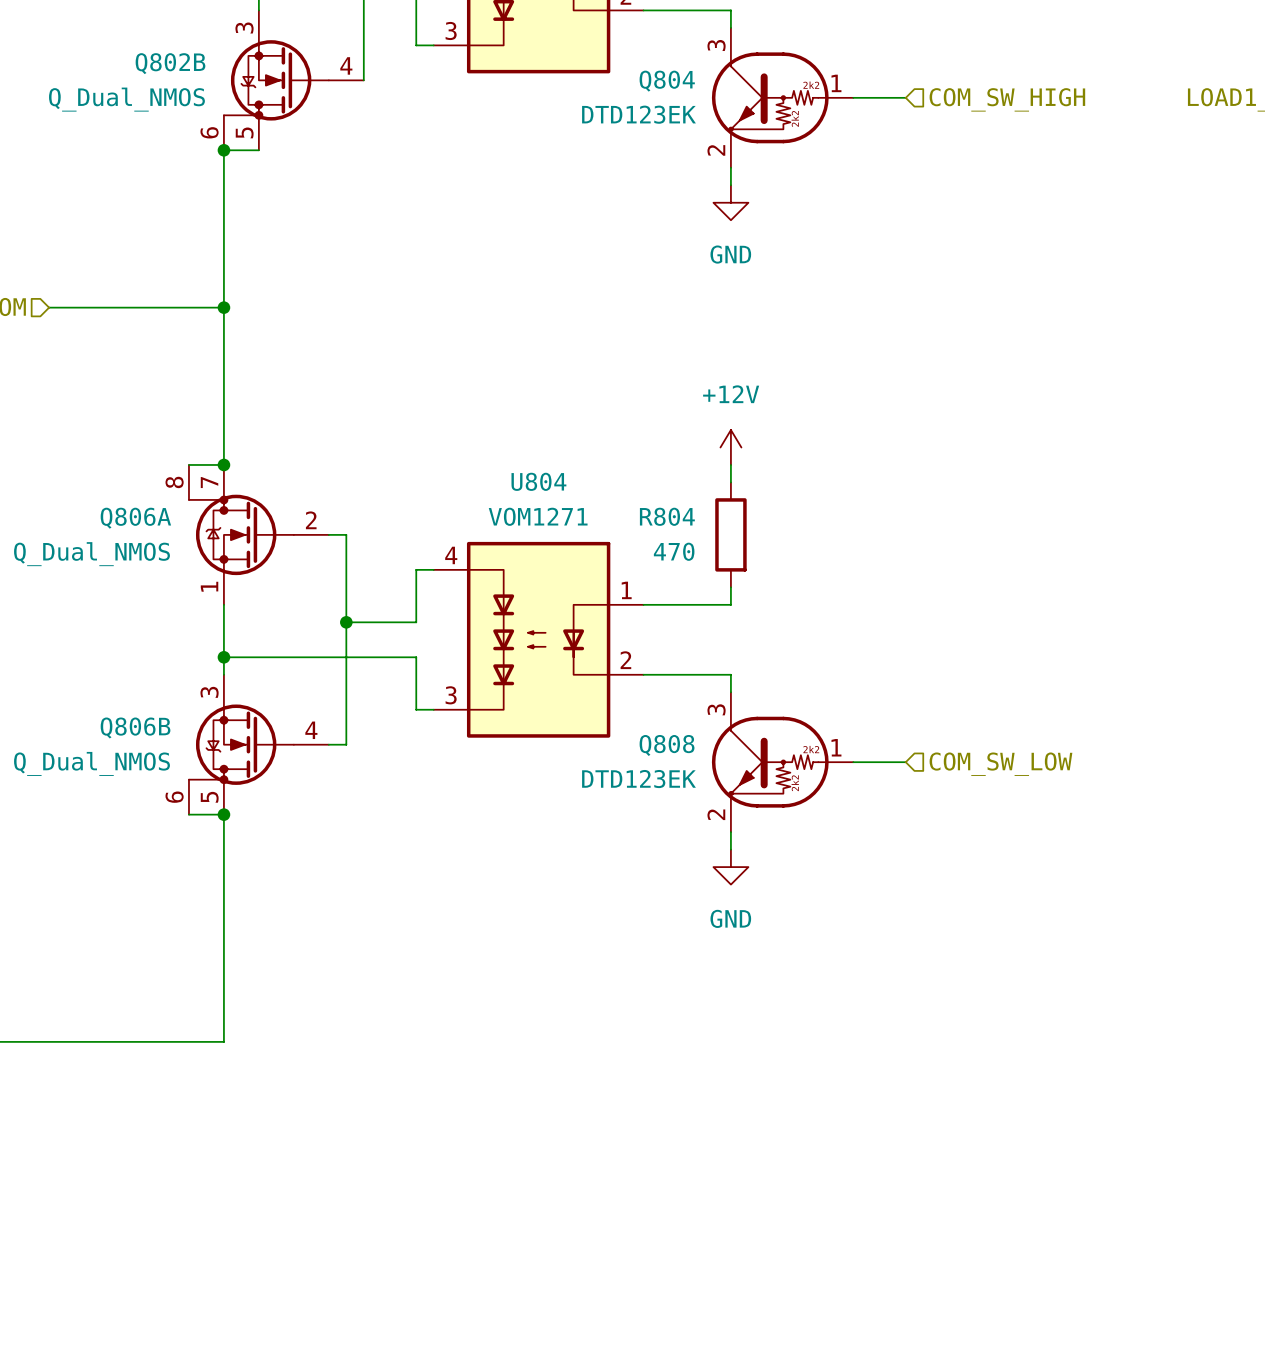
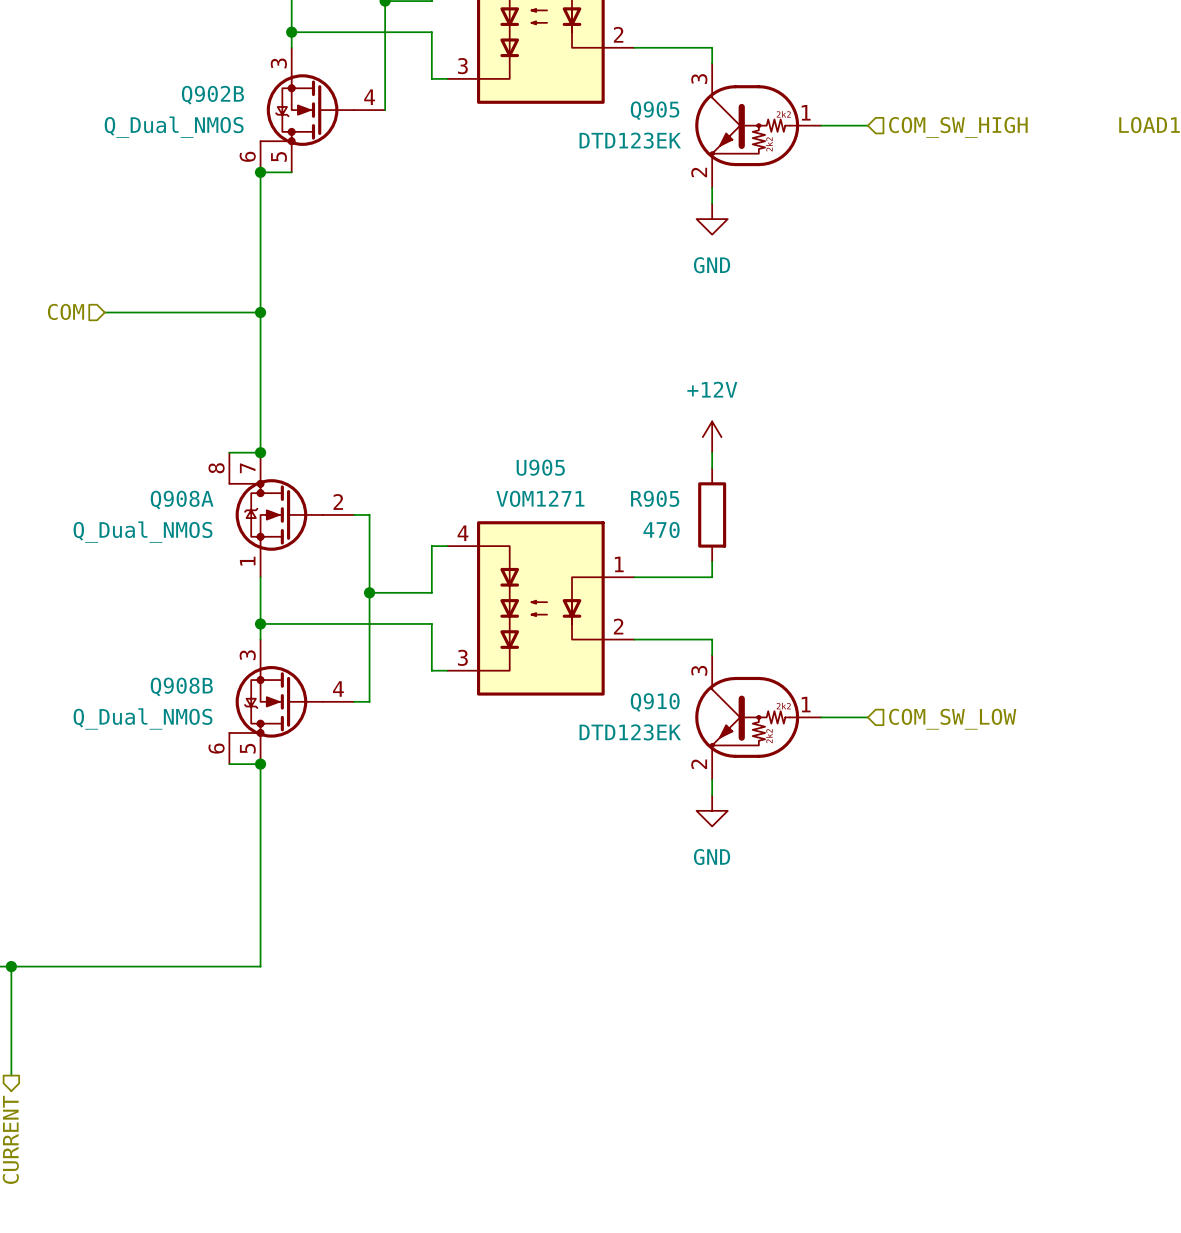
Q802B name: Q802B (170, 63) -> Q902B (212, 95)
Q804 name: Q804 (667, 81) -> Q905 (655, 110)
U804 name: U804 (538, 481) -> U905 (540, 467)
R804 name: R804 (667, 516) -> R905 (655, 498)
Q806A name: Q806A (135, 518) -> Q908A (182, 500)
Q806B name: Q806B (135, 727) -> Q908B (181, 686)
Q808 name: Q808 (667, 745) -> Q910 (655, 702)

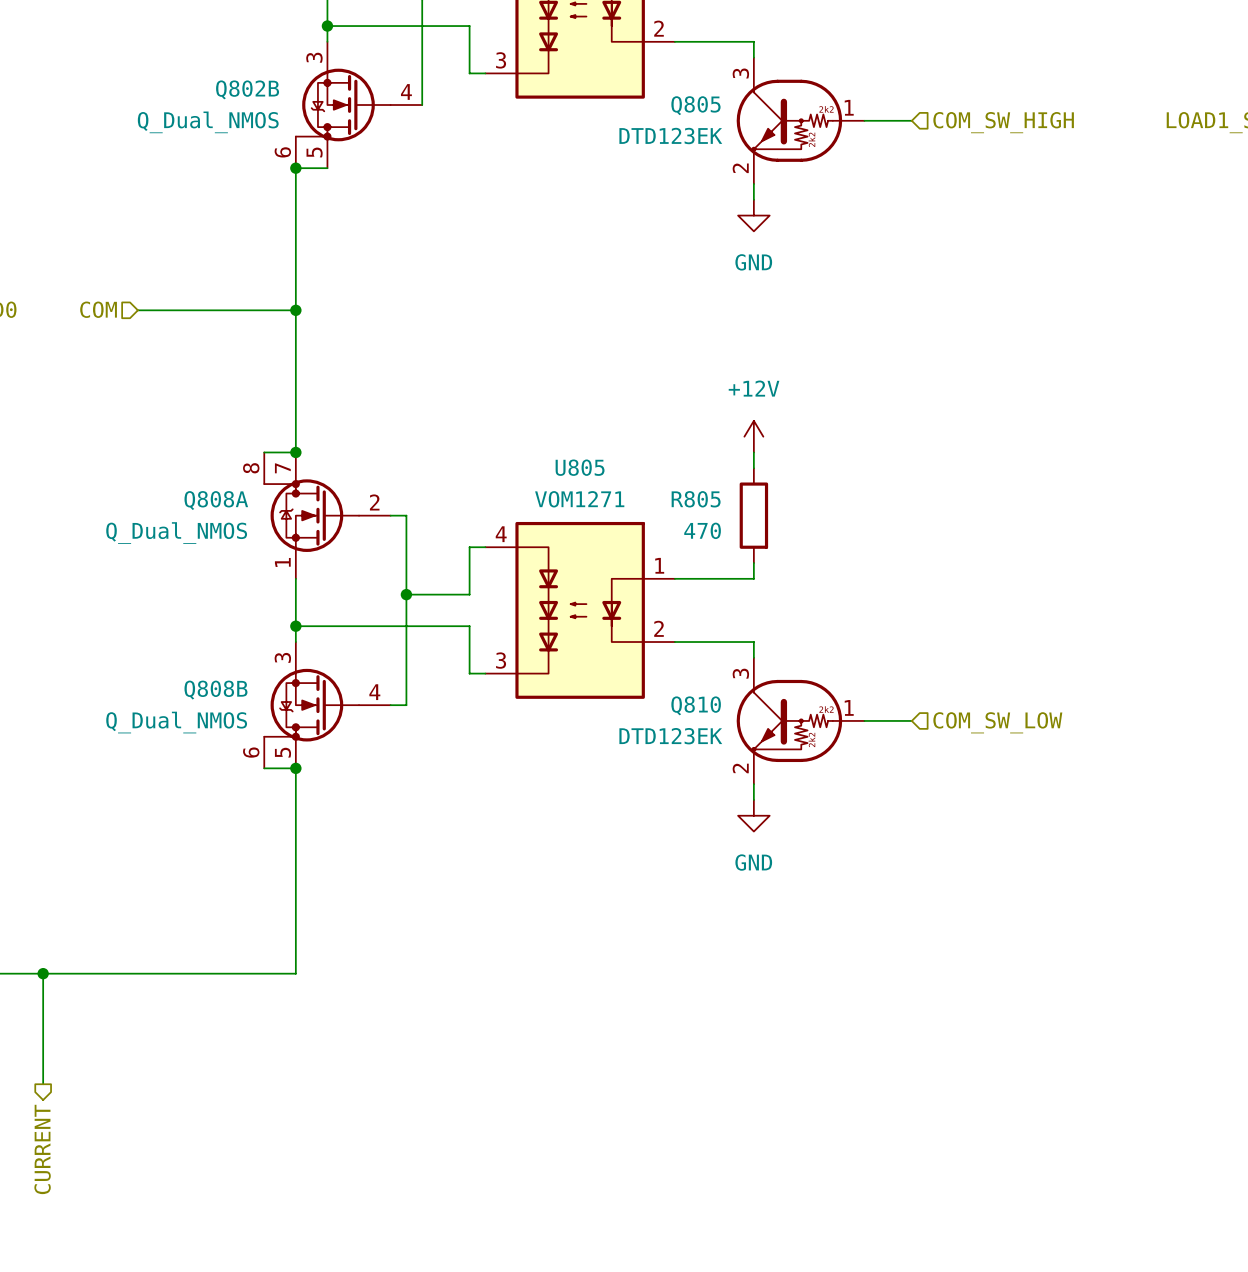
Q902B name: Q902B (212, 95) -> Q802B (247, 89)
Q905 name: Q905 (655, 110) -> Q805 (695, 105)
U905 name: U905 (540, 467) -> U805 (580, 467)
R905 name: R905 (655, 498) -> R805 (696, 499)
Q908A name: Q908A (182, 500) -> Q808A (216, 500)
Q908B name: Q908B (181, 686) -> Q808B (215, 690)
Q910 name: Q910 (655, 702) -> Q810 (696, 705)

